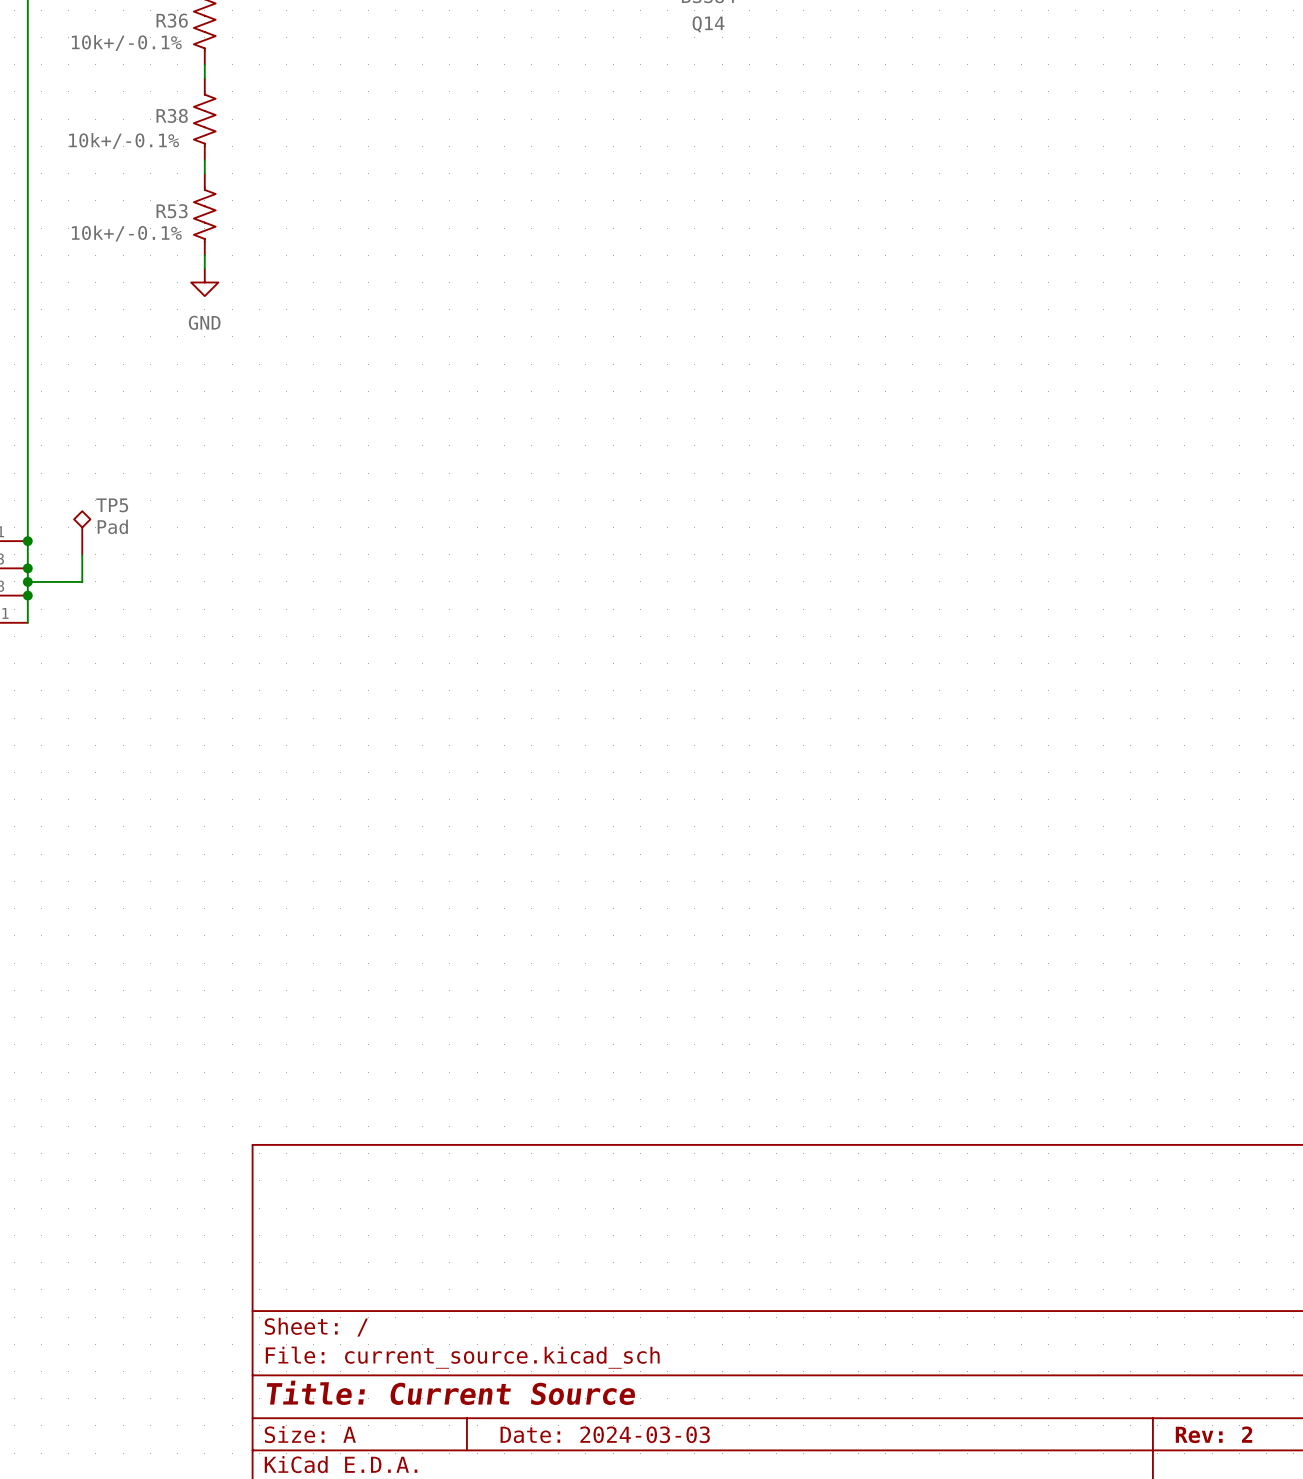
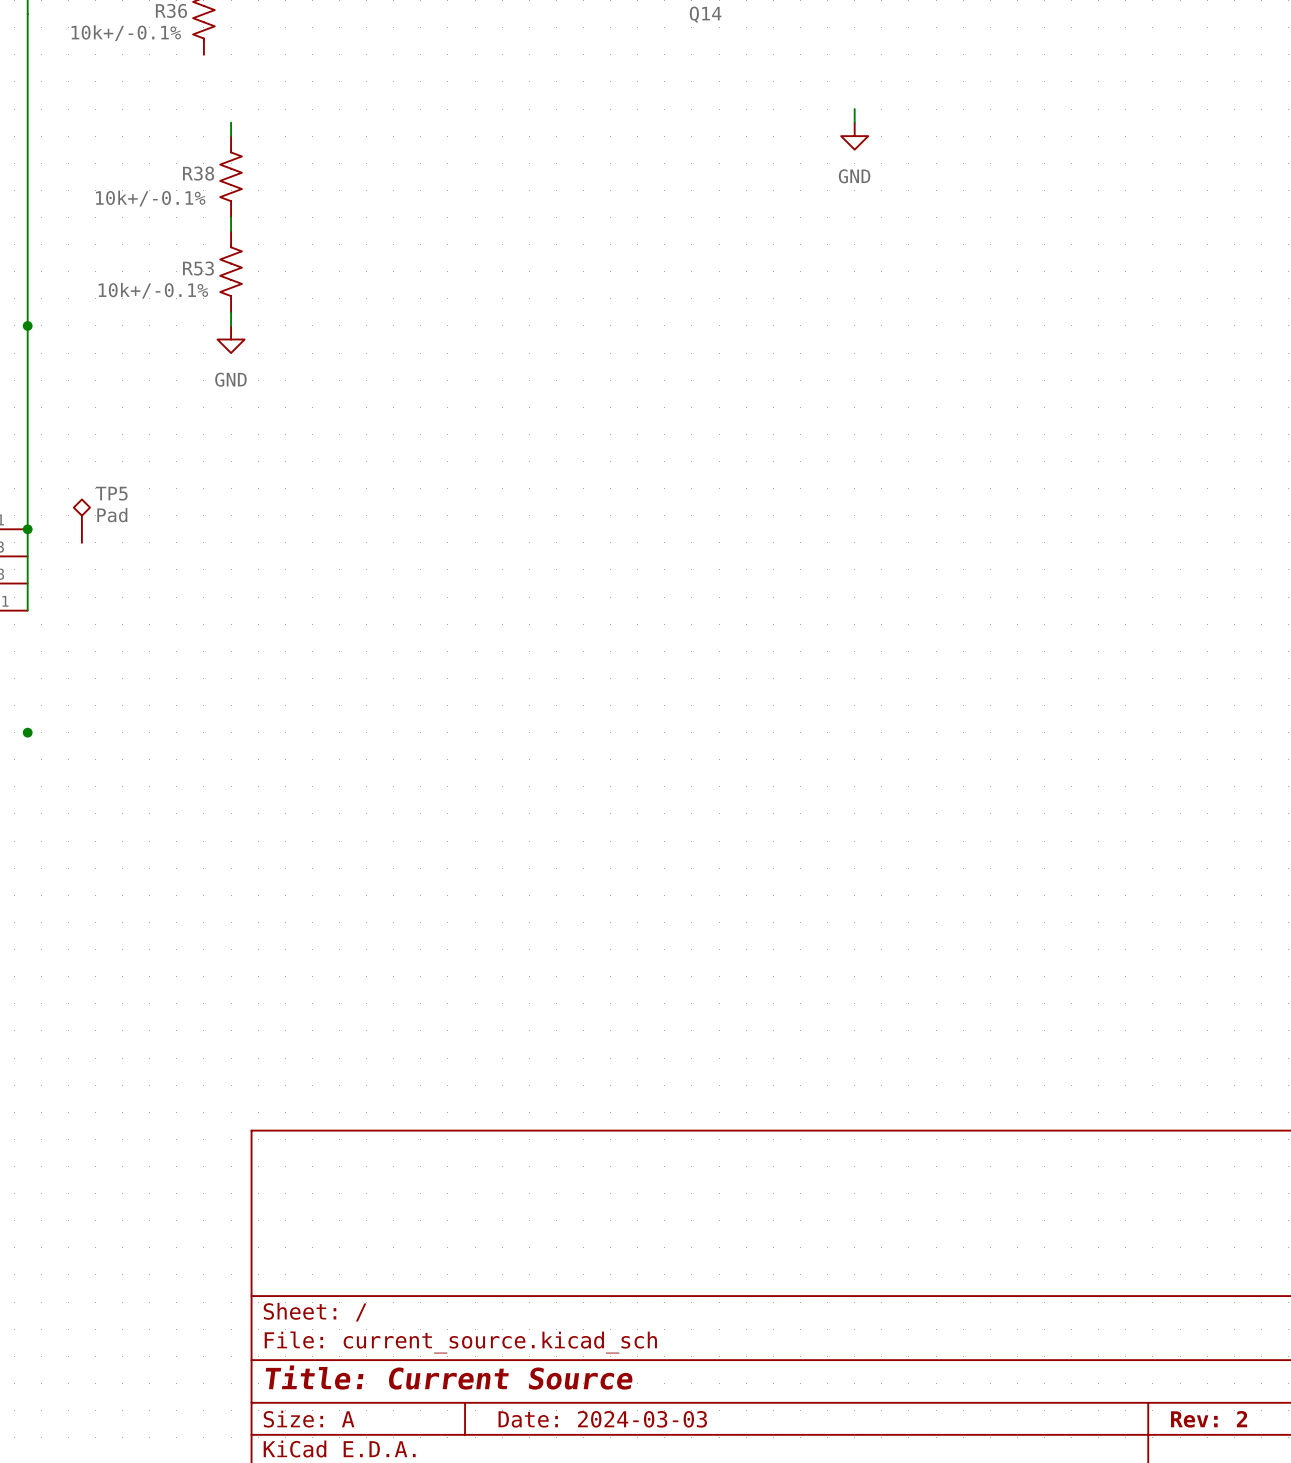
wire: (204, 64) (204, 78) -> (231, 122) (231, 136)
R38 position: (204, 119) -> (231, 176)
wire: none -> (854, 109) (854, 122)
power symbol: none -> GND (854, 136)
wire: (204, 159) (204, 173) -> (231, 217) (231, 231)
R53 position: (204, 214) -> (231, 271)
wire: (204, 255) (204, 268) -> (231, 312) (231, 325)
power symbol position: GND (204, 282) -> GND (231, 339)
junction: none -> (27, 325)
wire: (82, 554) (82, 581) (27, 581) -> none
junction: (27, 568) -> none
junction: (27, 581) -> none
junction: (27, 595) -> none
junction: none -> (27, 732)

